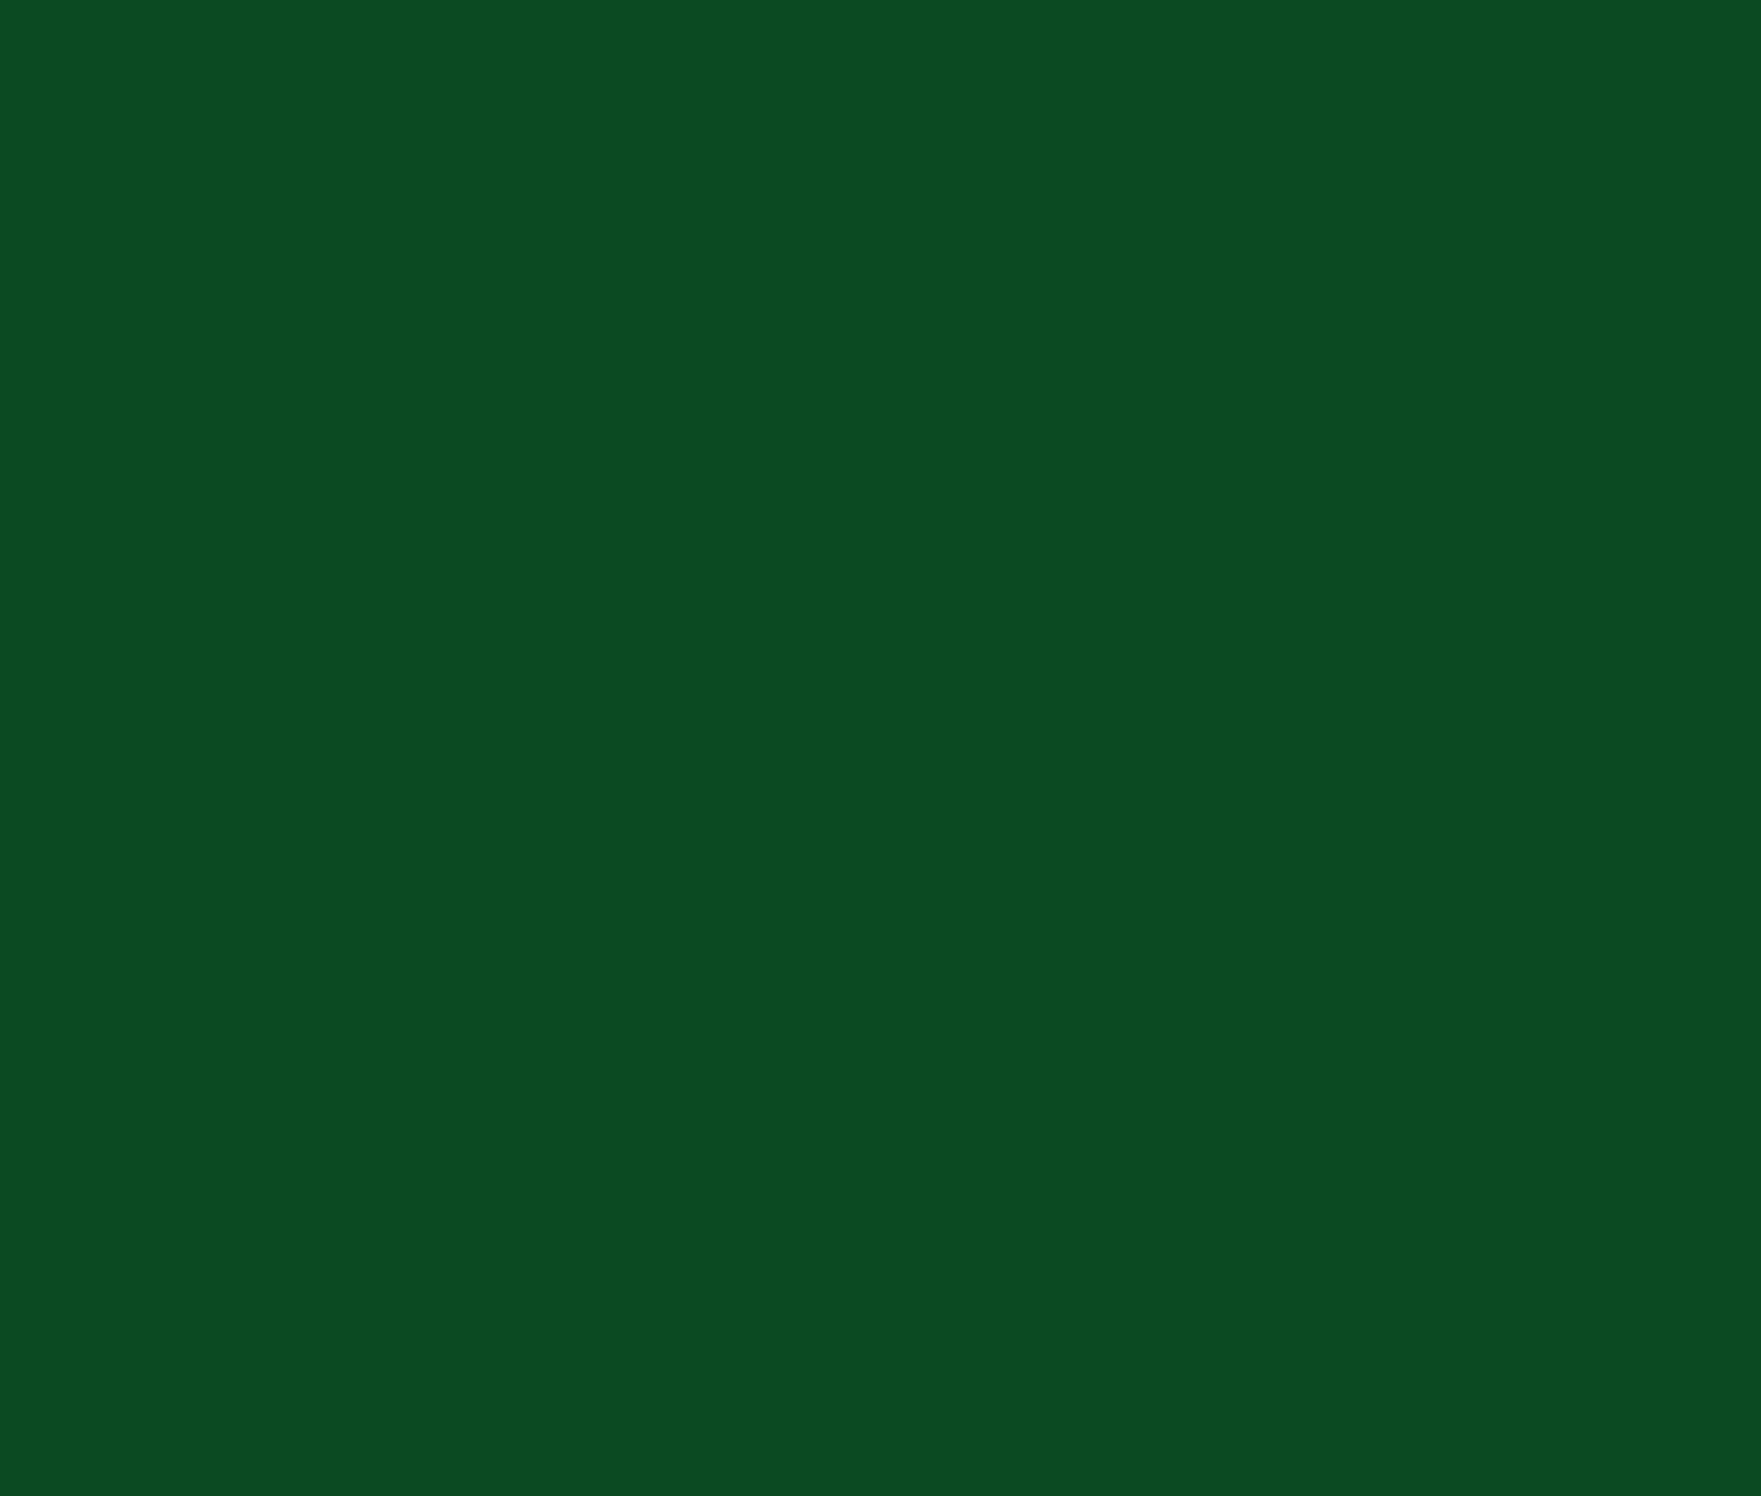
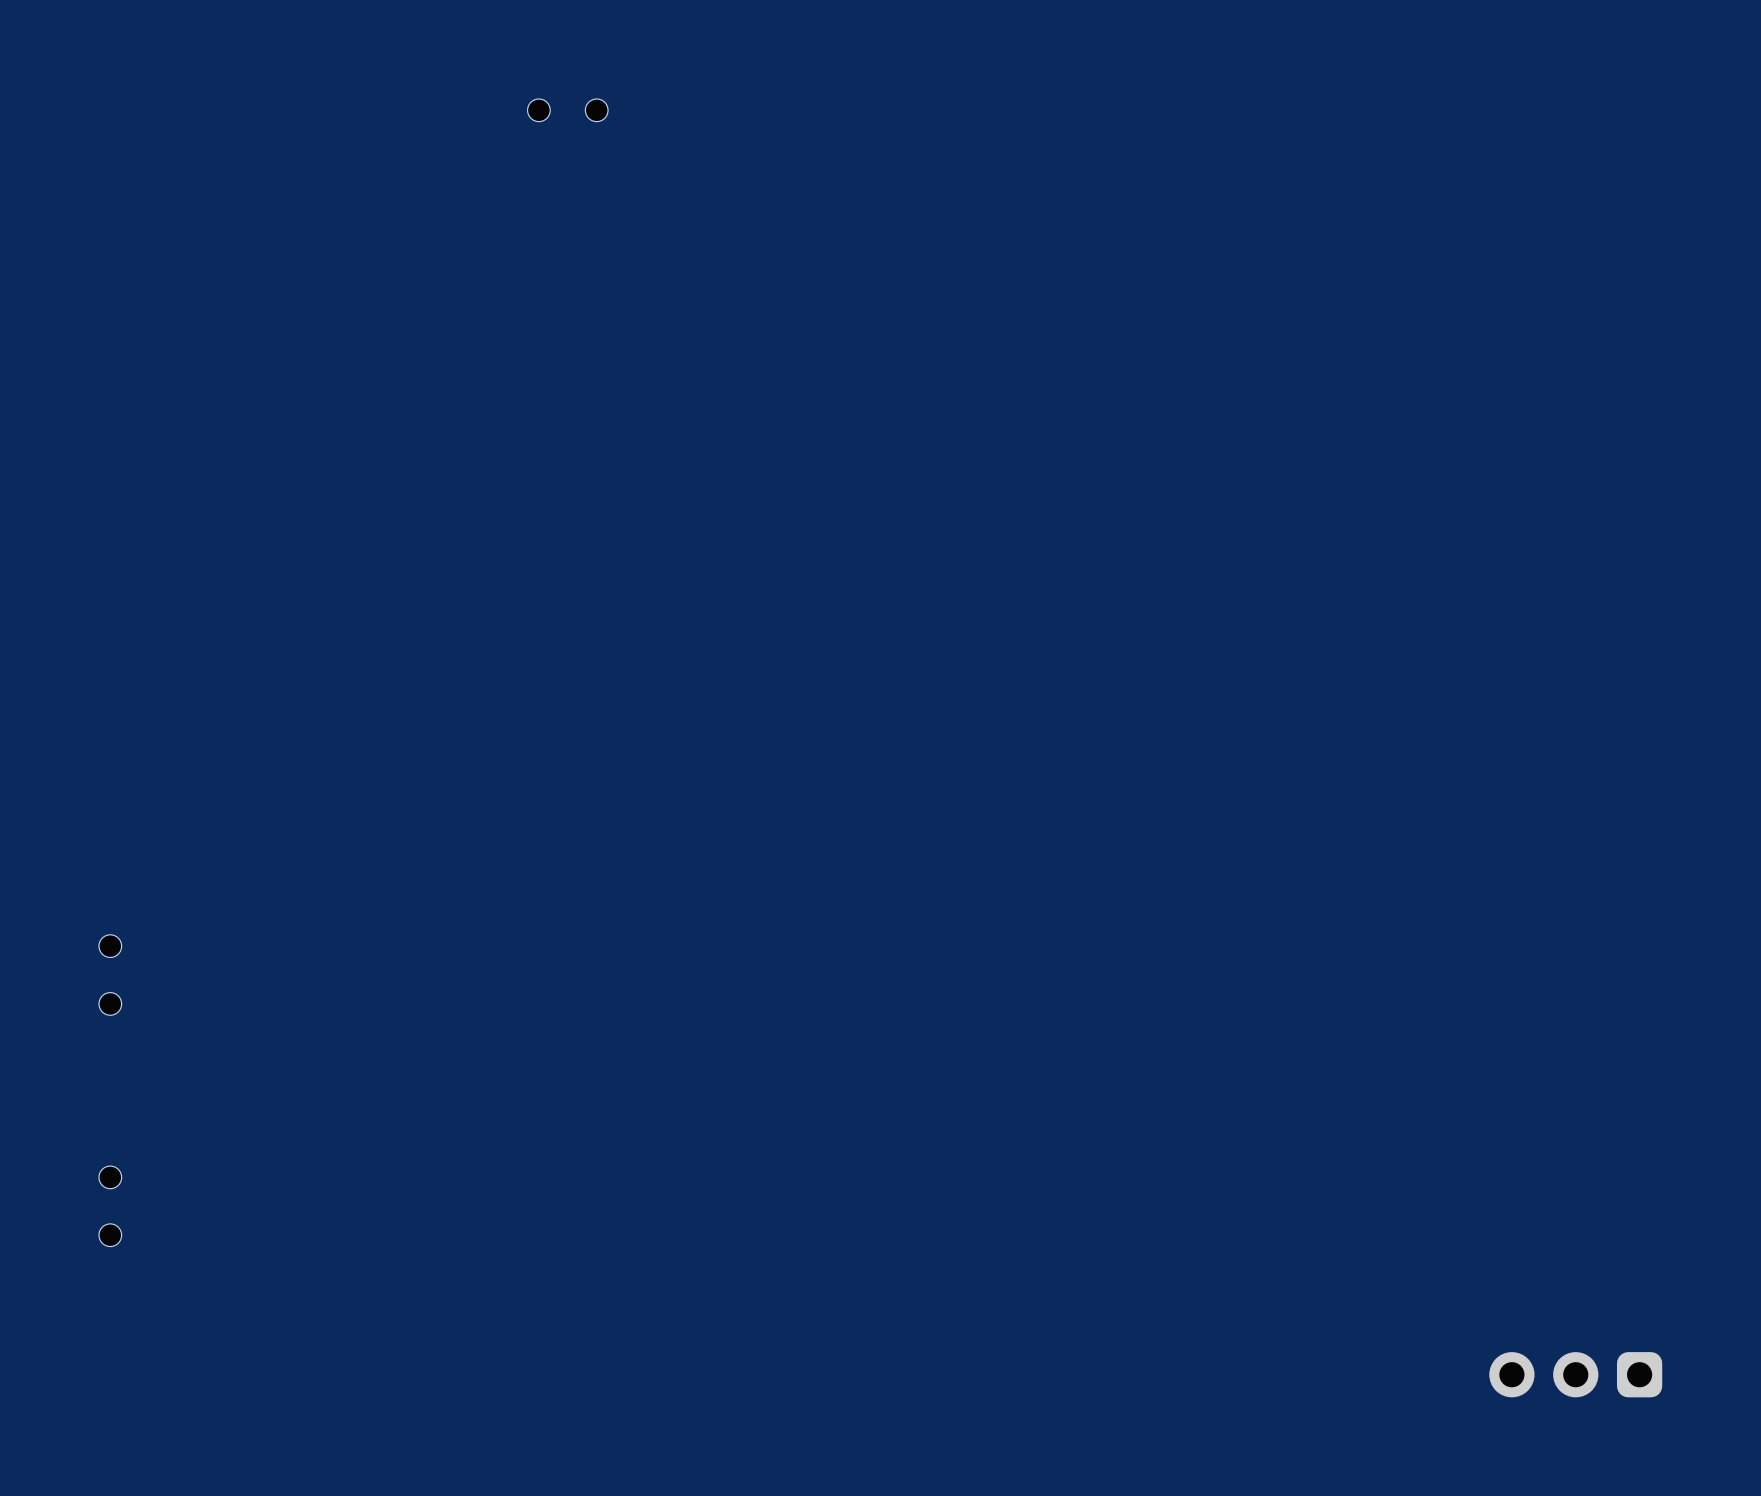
part: none -> (567, 110)
part: none -> (110, 975)
part: none -> (110, 1206)
part: none -> (1575, 1374)

